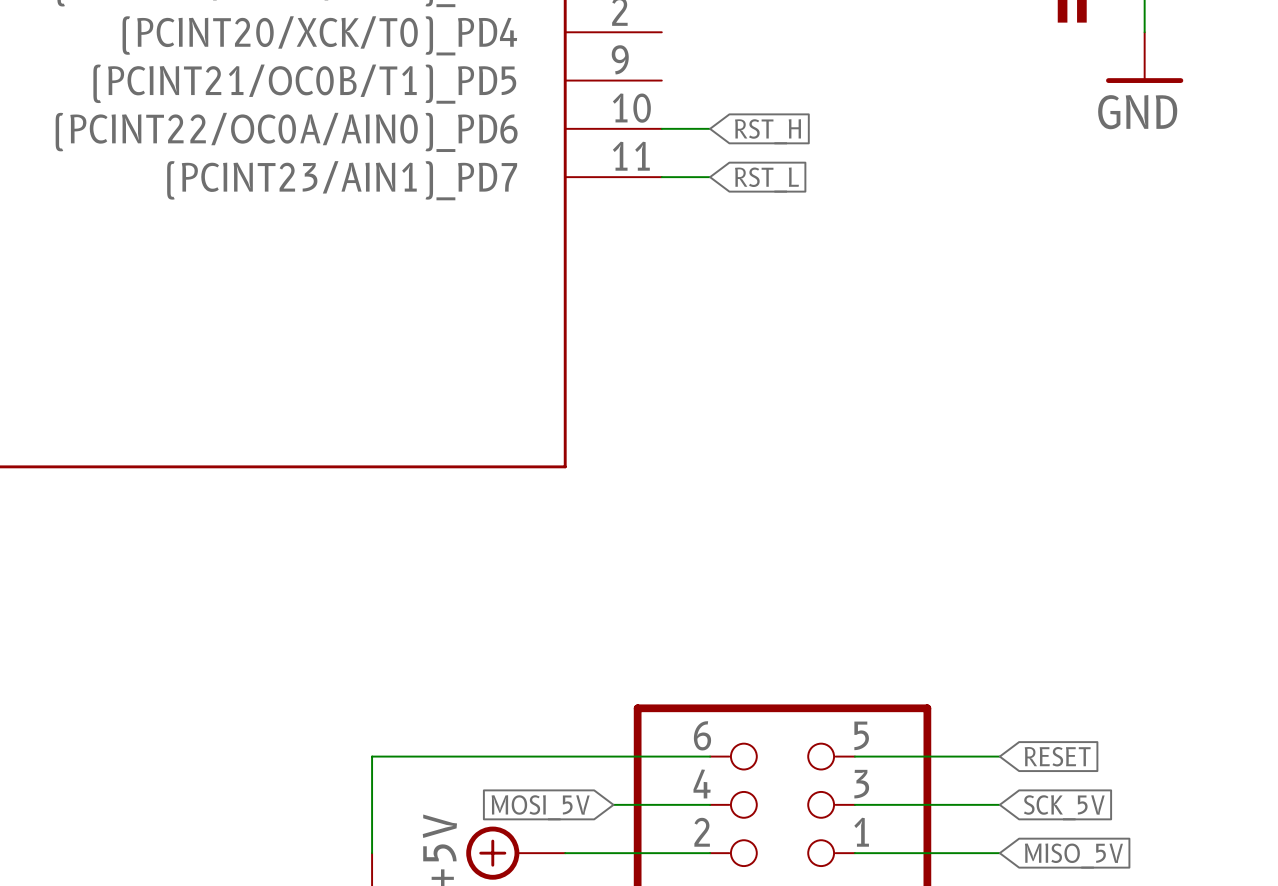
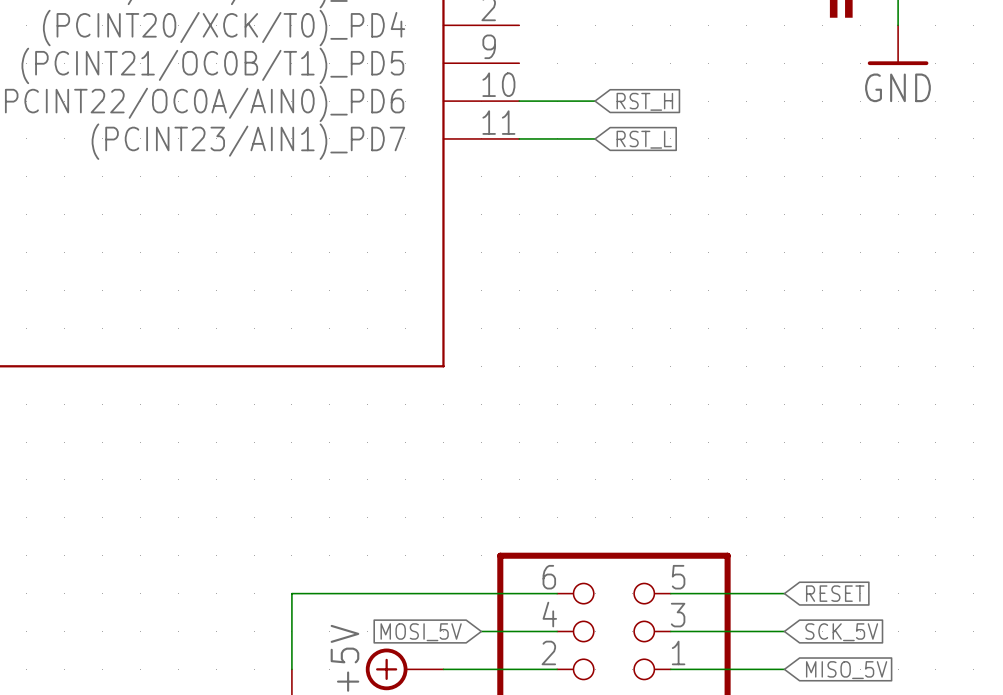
wire: none -> (557, 101) (595, 101)
global label position: RST_H (767, 131) -> RST_H (644, 101)
wire: none -> (557, 138) (595, 138)
global label position: RST_L (766, 180) -> RST_L (644, 139)

